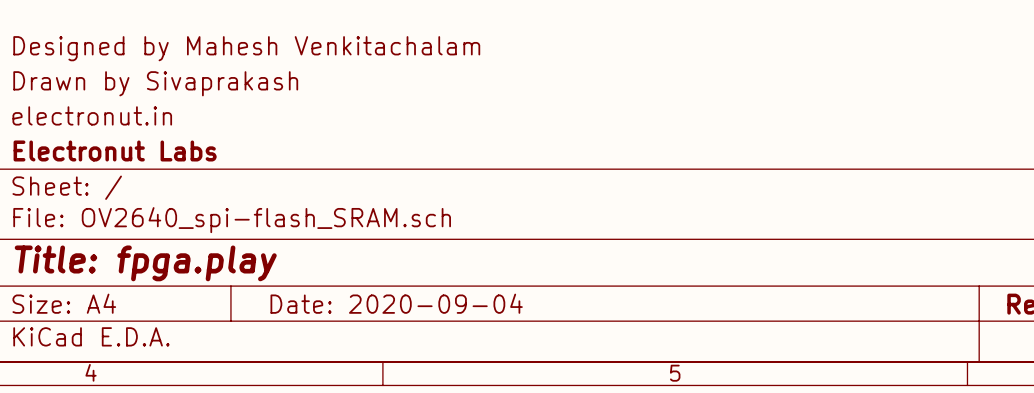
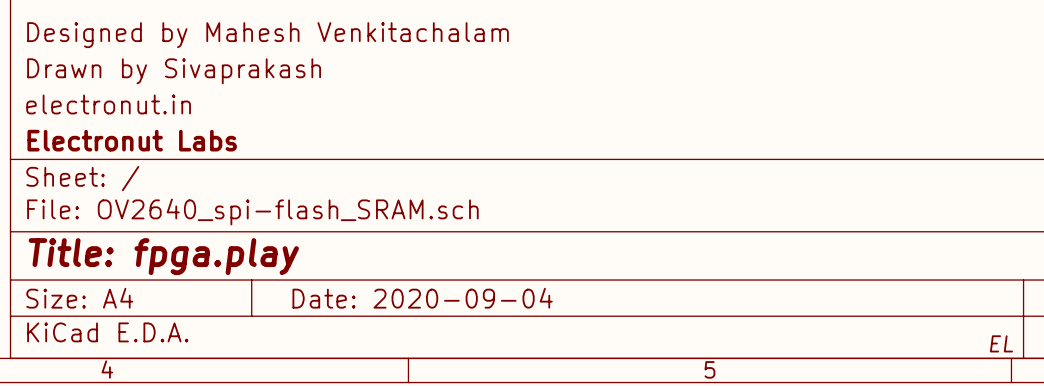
part: none -> (1001, 343)

